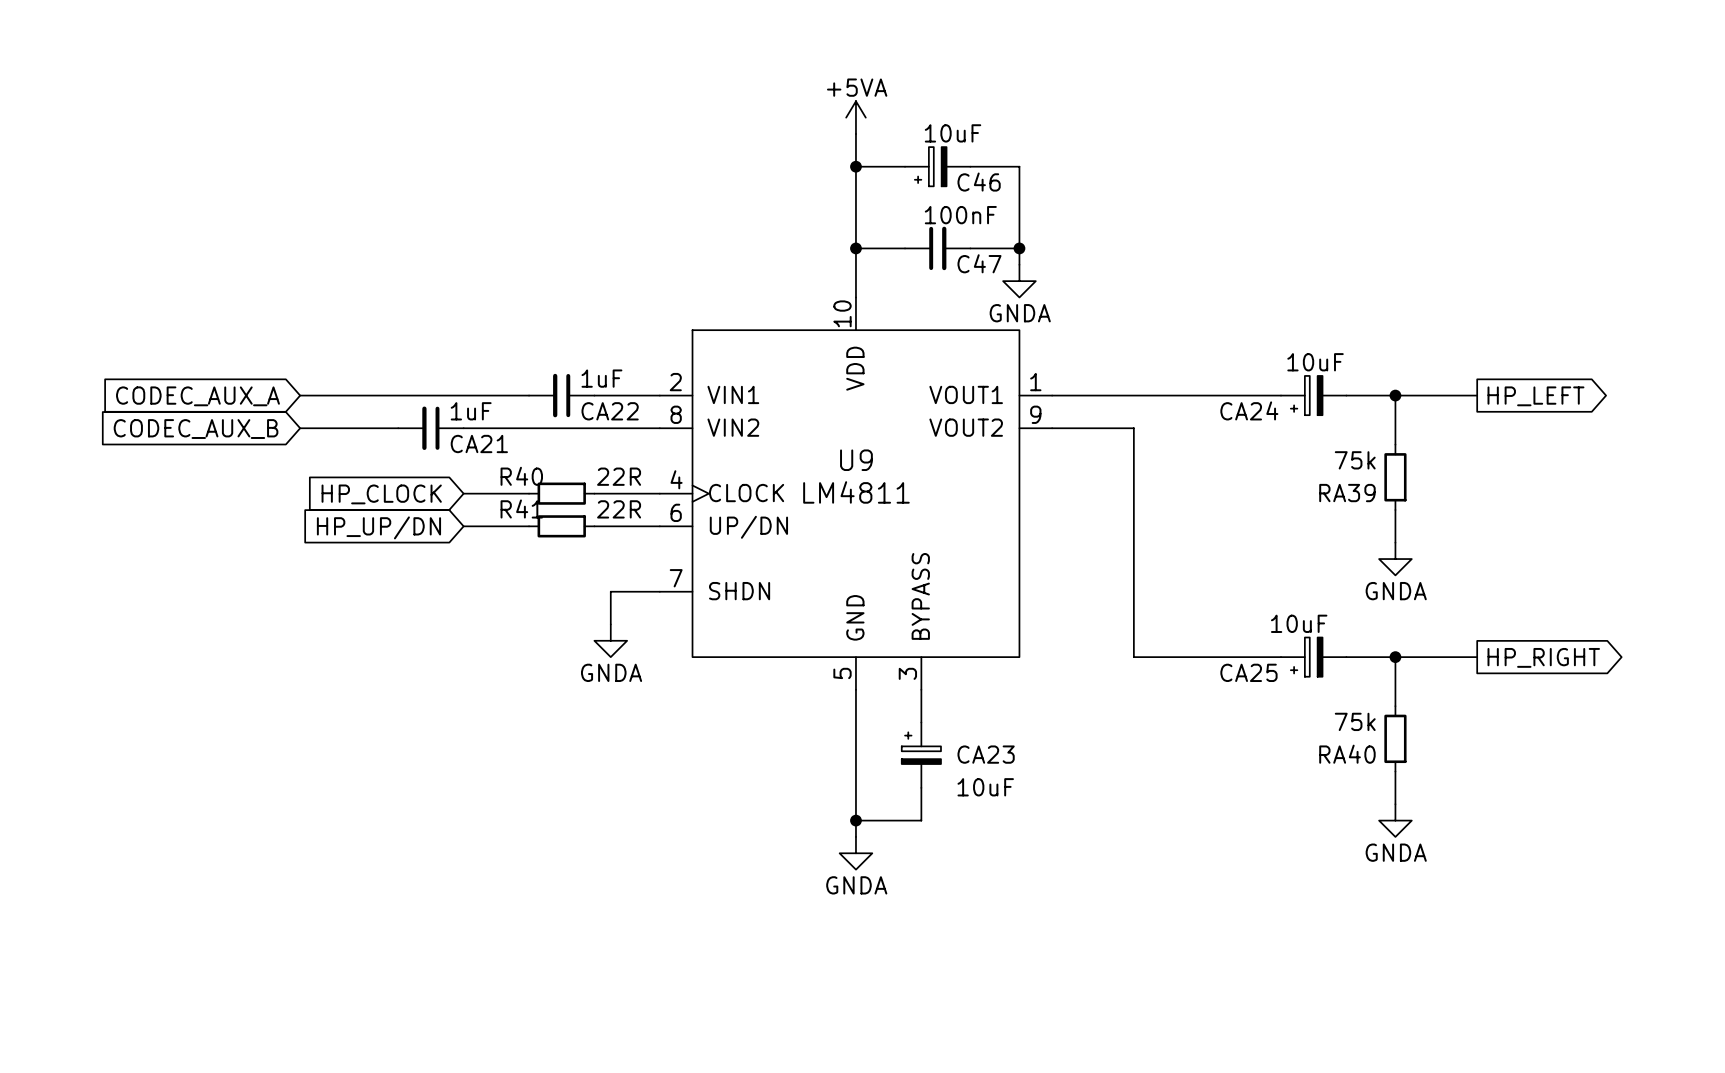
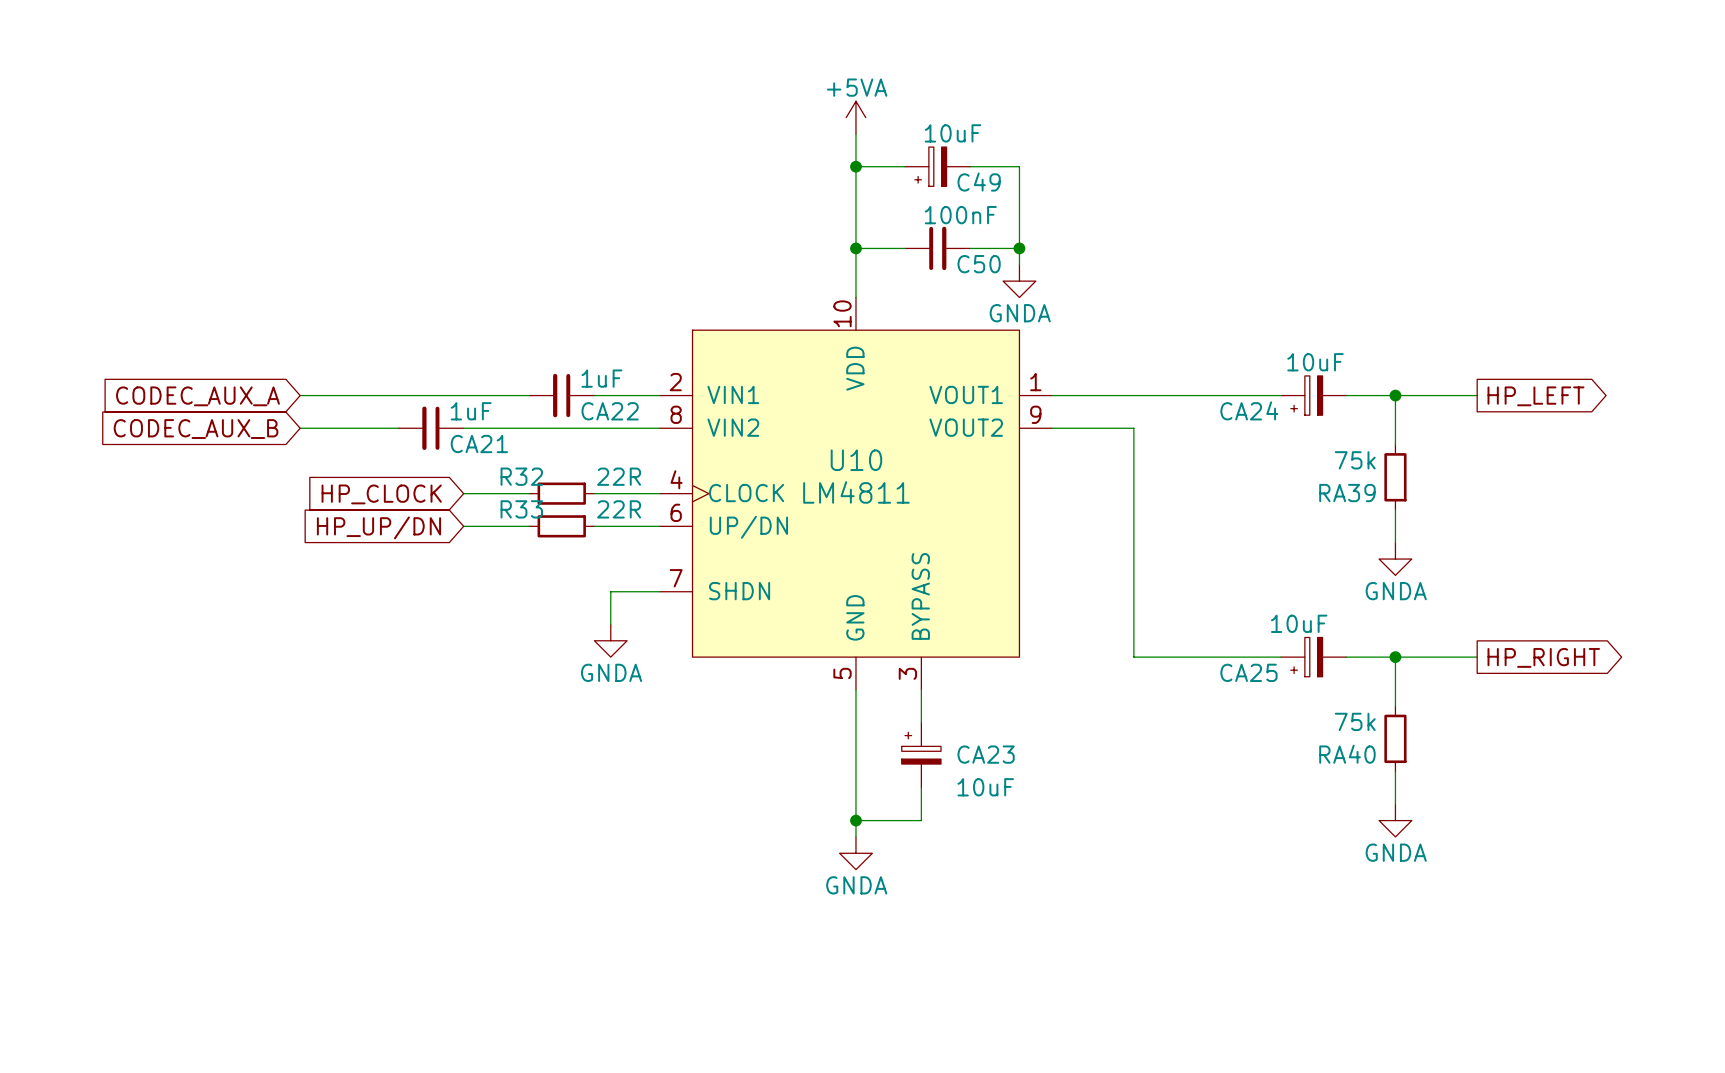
C46 name: C46 (979, 182) -> C49 (979, 182)
C47 name: C47 (979, 263) -> C50 (979, 264)
U9 name: U9 (856, 460) -> U10 (856, 460)
R40 name: R40 (521, 476) -> R32 (521, 476)
R41 name: R41 (521, 508) -> R33 (521, 509)

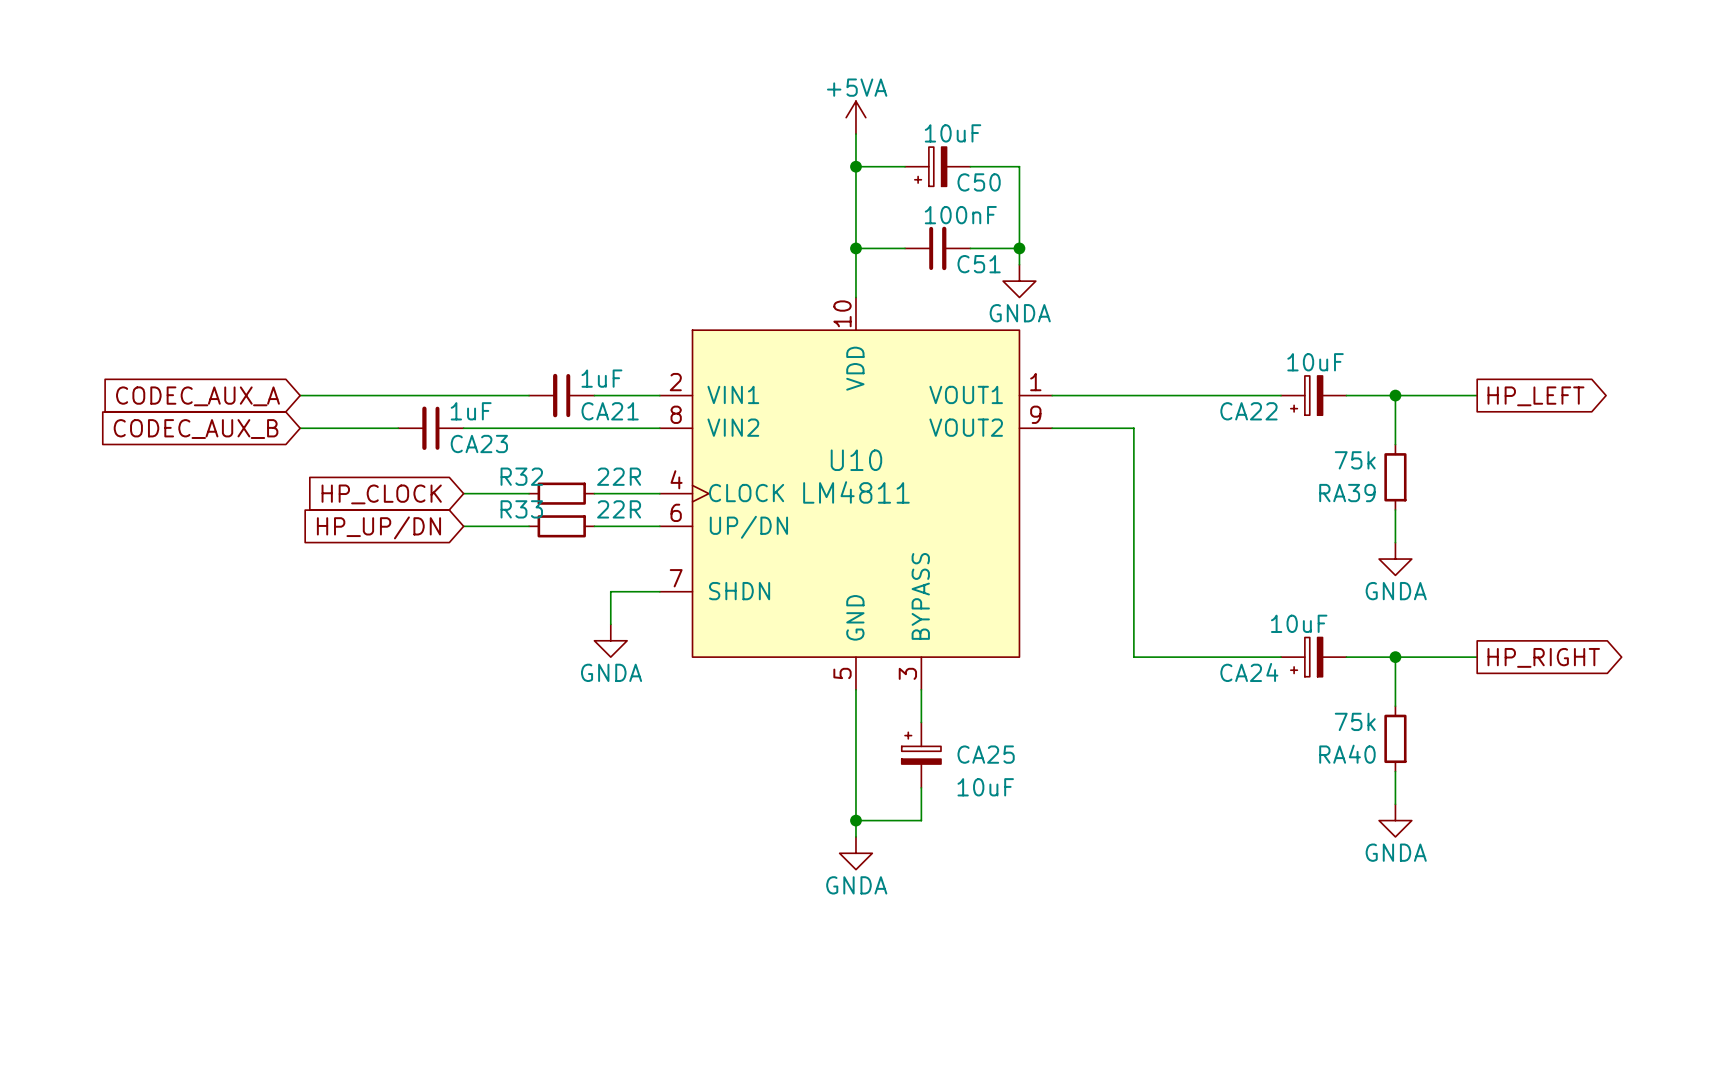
C49 name: C49 (979, 182) -> C50 (979, 182)
C50 name: C50 (979, 264) -> C51 (979, 264)
CA24 name: CA24 (1249, 410) -> CA22 (1248, 411)
CA22 name: CA22 (610, 411) -> CA21 (610, 411)
CA21 name: CA21 (479, 443) -> CA23 (479, 443)
CA25 name: CA25 (1248, 672) -> CA24 (1249, 672)
CA23 name: CA23 (986, 754) -> CA25 (986, 754)

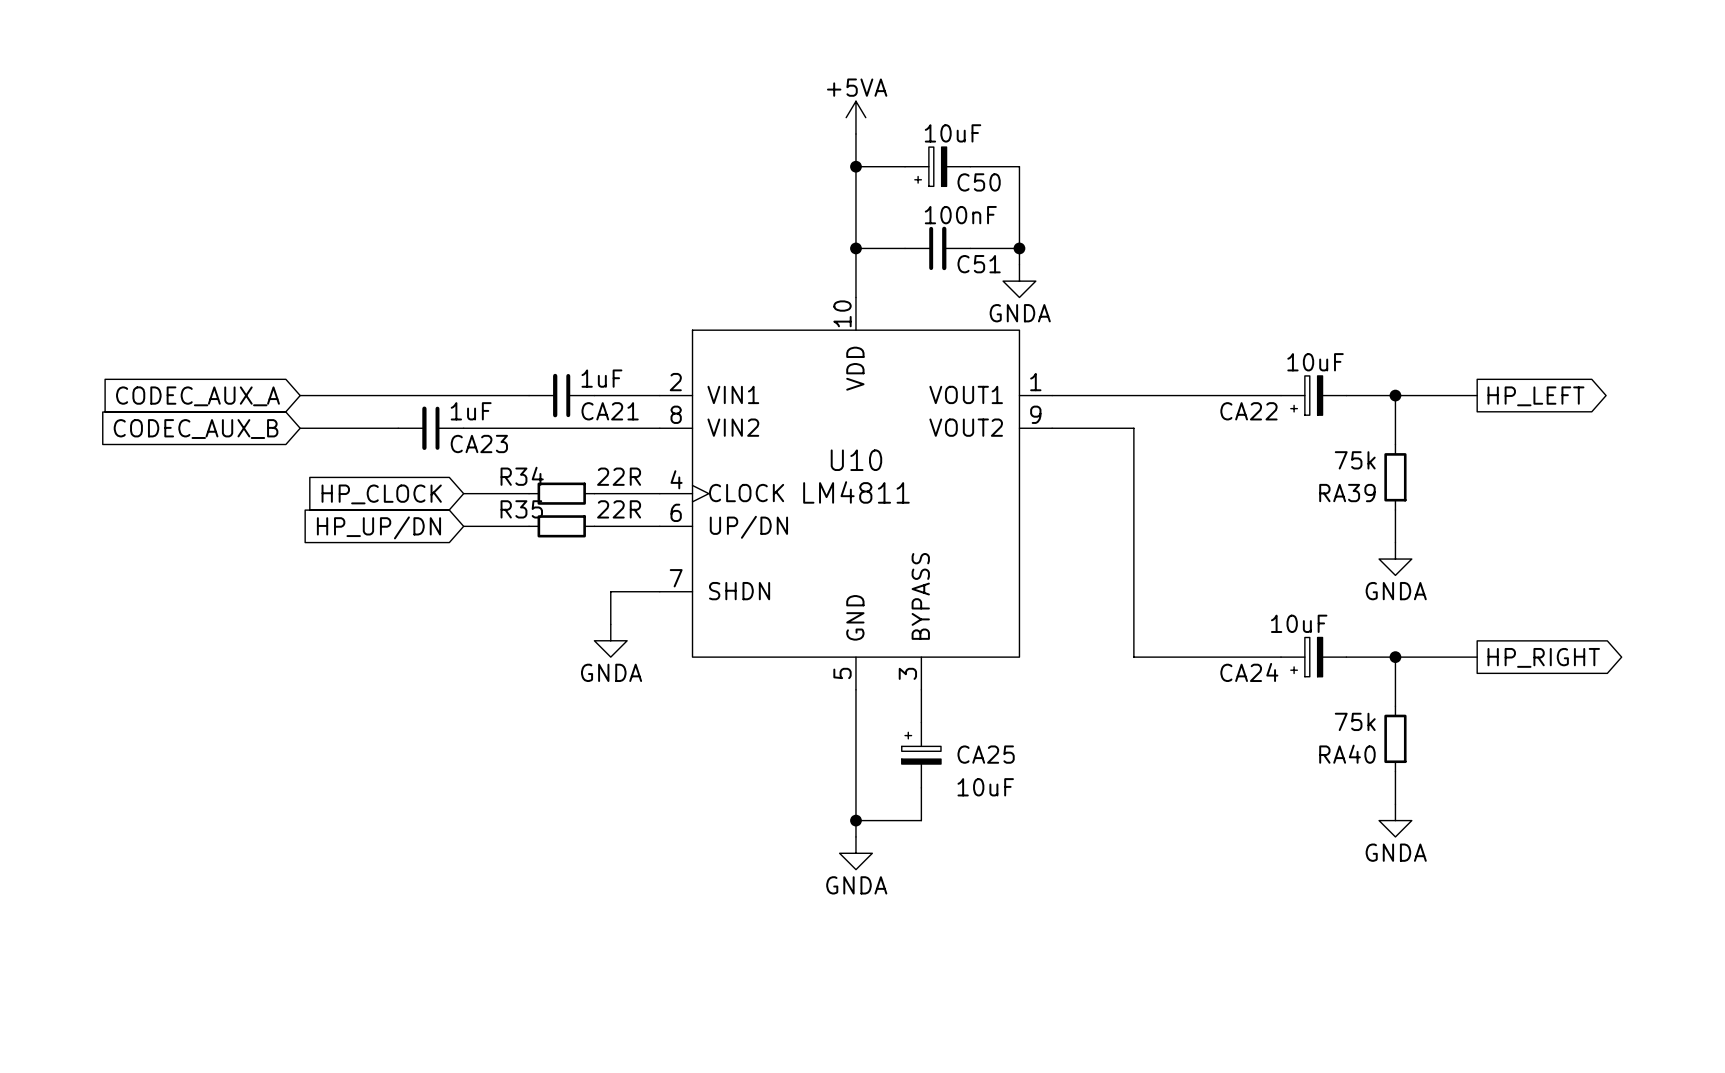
R32 name: R32 (521, 476) -> R34 (522, 476)
R33 name: R33 (521, 509) -> R35 (521, 509)

